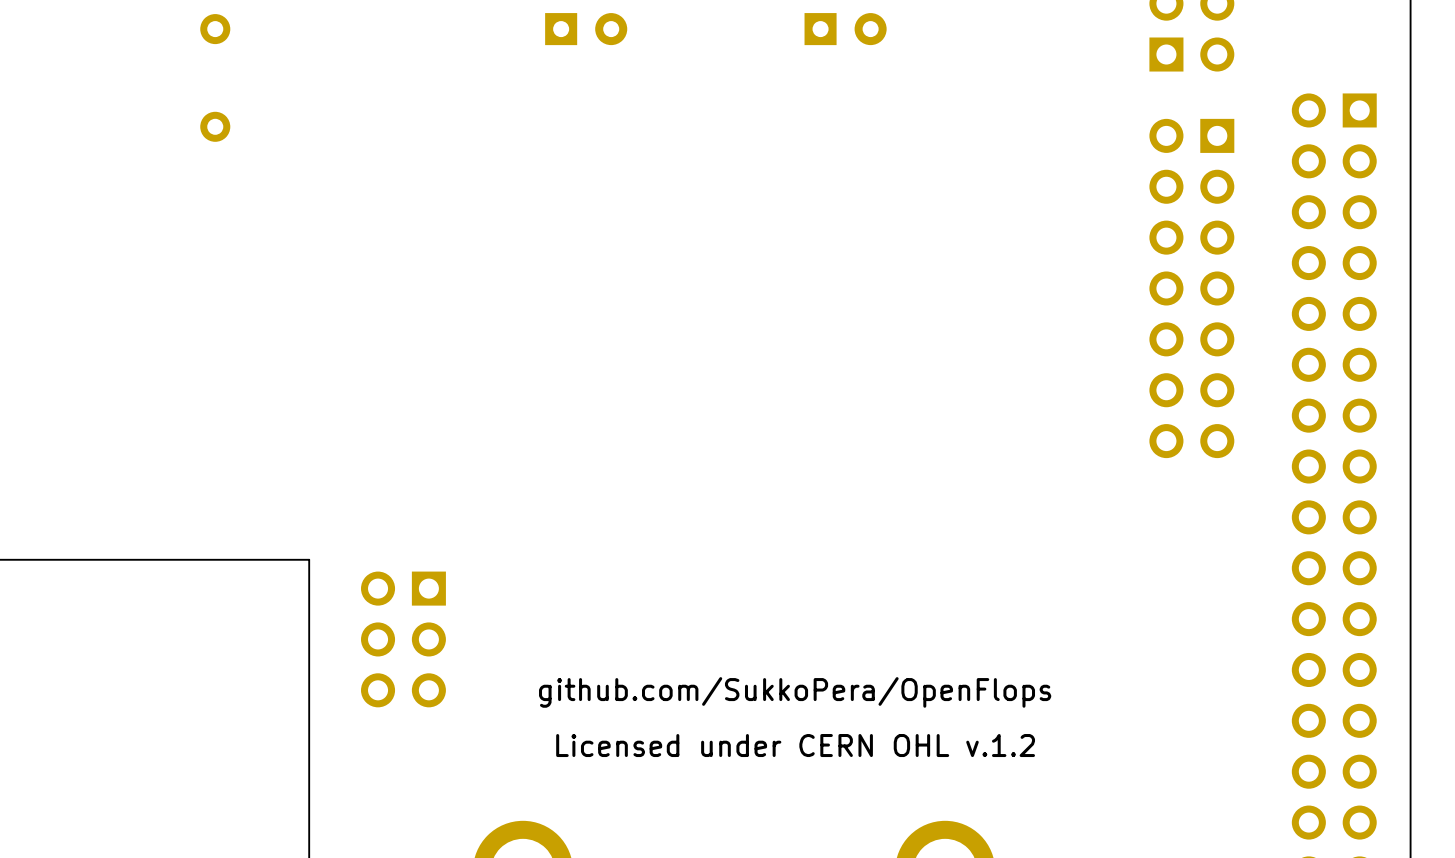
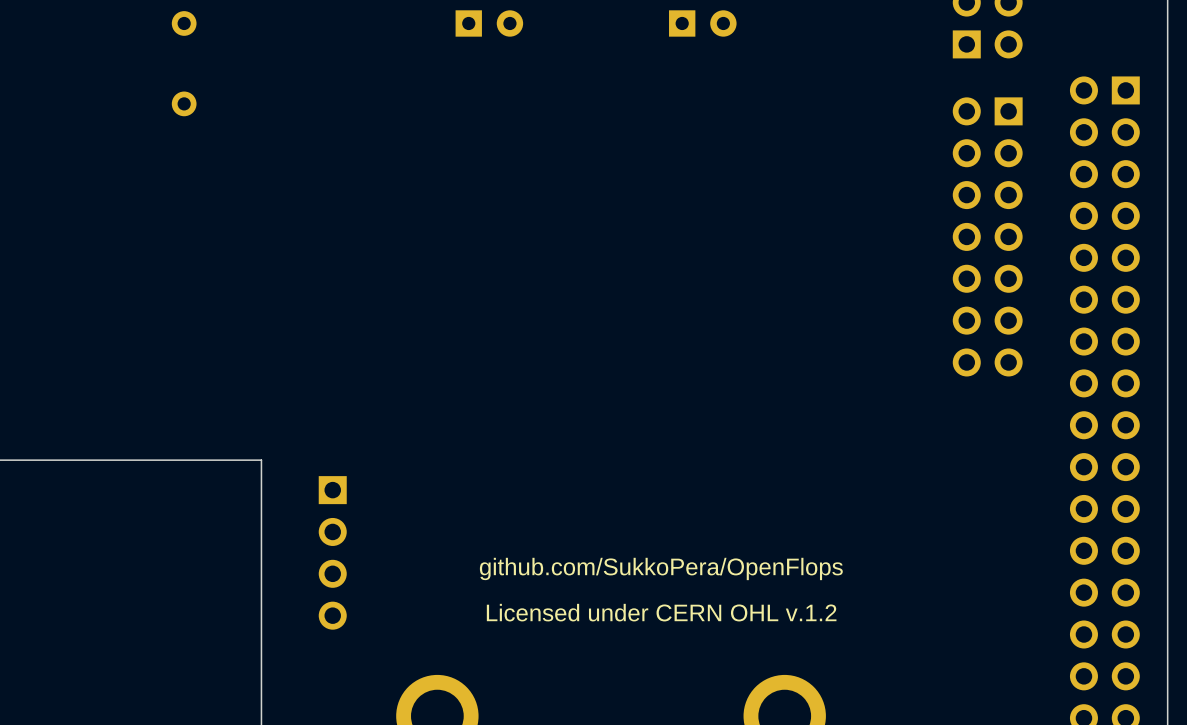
part: (403, 639) -> none
part: none -> (332, 552)

